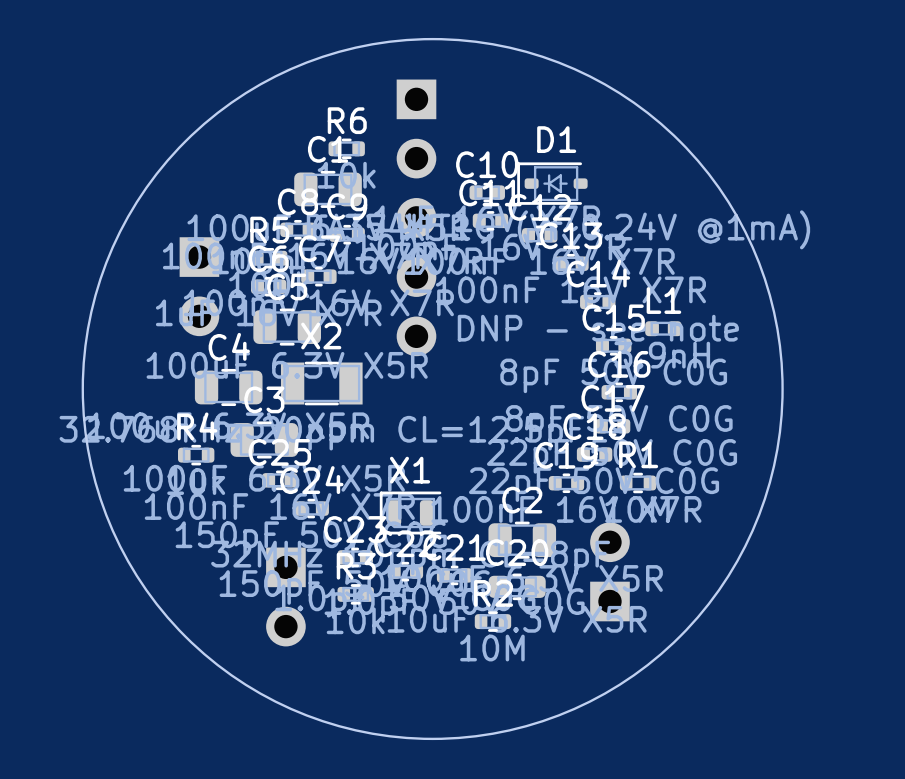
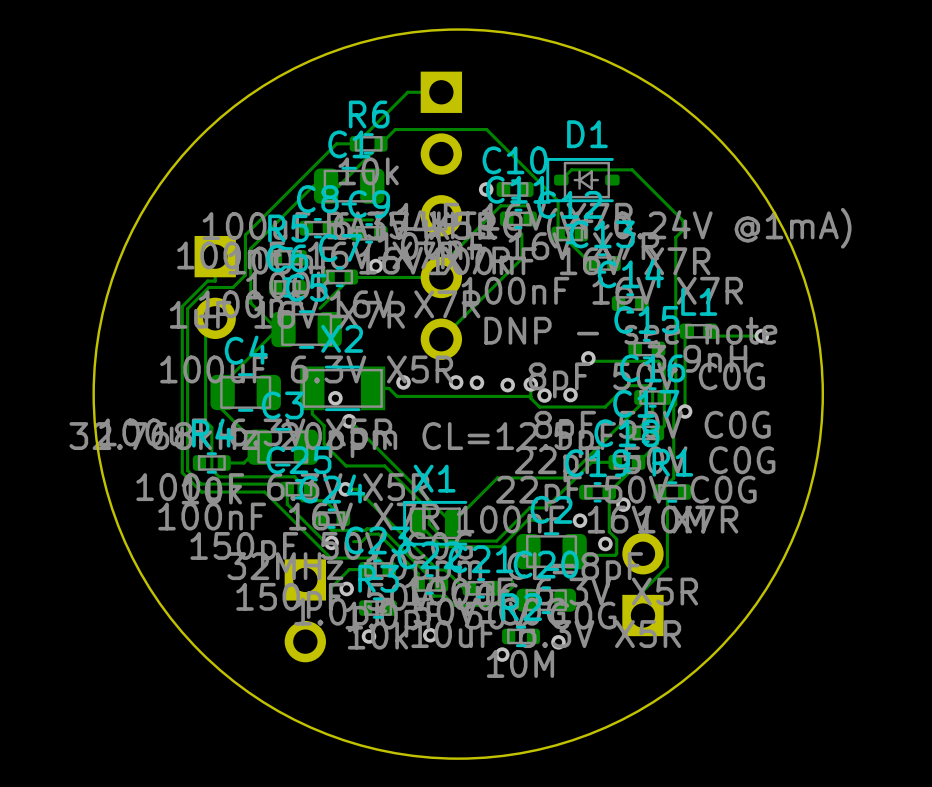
track: none -> (441, 92) (407, 92) (356, 143) (336, 143) (245, 234) (245, 275) (233, 287) (208, 287) (187, 308) (187, 470) (201, 484) (282, 484) (287, 489) (287, 504) (325, 542) (331, 542)
track: none -> (561, 180) (571, 169) (632, 169) (683, 220) (683, 230) (675, 237) (673, 478) (659, 492) (667, 499) (667, 566) (642, 591) (642, 615)
via: none -> (486, 189)
track: none -> (526, 205) (500, 205) (441, 265) (441, 277) (351, 277) (319, 308)
track: none -> (372, 219) (337, 219) (329, 228)
track: none -> (559, 232) (590, 263)
track: none -> (521, 233) (521, 258) (441, 339)
track: none -> (558, 233) (558, 201) (486, 129) (395, 129) (338, 186) (313, 186) (250, 248) (250, 302) (277, 329)
track: none -> (215, 256) (215, 281) (207, 281) (182, 306) (182, 472) (201, 492) (264, 492) (330, 558) (377, 558) (389, 569)
via: none -> (375, 266)
track: none -> (215, 318) (205, 327) (205, 421) (211, 427) (211, 469) (219, 476) (294, 476) (298, 481) (298, 497) (302, 500) (325, 500) (343, 518)
track: none -> (277, 329) (222, 384) (222, 410) (259, 447) (243, 462) (224, 462)
track: none -> (686, 331) (685, 333) (685, 411)
track: none -> (710, 331) (715, 336) (761, 336)
via: none -> (761, 336)
track: none -> (588, 358) (591, 361) (658, 361) (664, 367) (664, 425) (657, 432) (657, 443) (609, 492) (609, 531) (616, 539) (616, 553) (574, 555)
via: none -> (588, 358)
via: none -> (403, 382)
via: none -> (456, 382)
via: none -> (476, 382)
track: none -> (530, 384) (530, 398) (539, 407) (605, 407) (626, 385) (648, 385) (652, 389) (652, 414) (634, 432)
via: none -> (530, 384)
via: none -> (507, 385)
track: none -> (312, 388) (312, 414) (324, 425) (324, 443) (346, 465) (384, 465) (429, 510) (429, 524) (445, 541) (496, 541) (529, 507) (546, 507) (591, 462) (615, 462)
track: none -> (373, 388) (388, 388) (397, 396) (530, 396)
via: none -> (570, 395)
via: none -> (544, 395)
track: none -> (640, 397) (640, 404) (567, 477) (497, 477) (452, 523) (349, 421)
via: none -> (335, 398)
via: none -> (685, 411)
via: none -> (349, 421)
track: none -> (345, 489) (357, 489) (437, 569) (445, 569) (463, 588) (469, 588)
via: none -> (345, 489)
via: none -> (623, 504)
track: none -> (320, 518) (331, 530) (381, 528) (430, 577) (430, 592) (434, 596) (445, 596) (454, 605) (493, 605) (512, 586) (512, 581)
track: none -> (542, 520) (527, 520) (501, 546) (441, 546) (418, 523)
via: none -> (580, 520)
track: none -> (353, 541) (361, 541) (369, 534) (378, 534) (418, 573) (418, 584)
via: none -> (331, 542)
via: none -> (605, 543)
track: none -> (365, 569) (349, 569) (331, 587) (331, 609)
via: none -> (346, 588)
via: none -> (430, 635)
via: none -> (369, 636)
via: none -> (558, 642)
via: none -> (502, 654)

